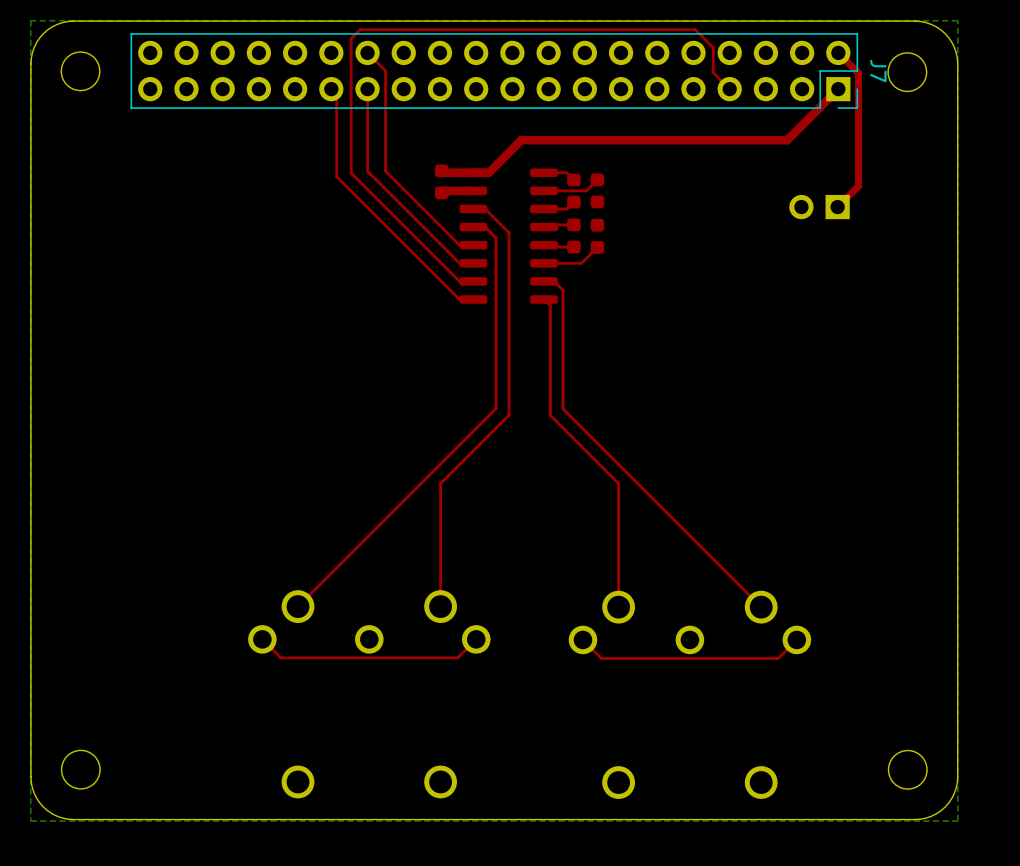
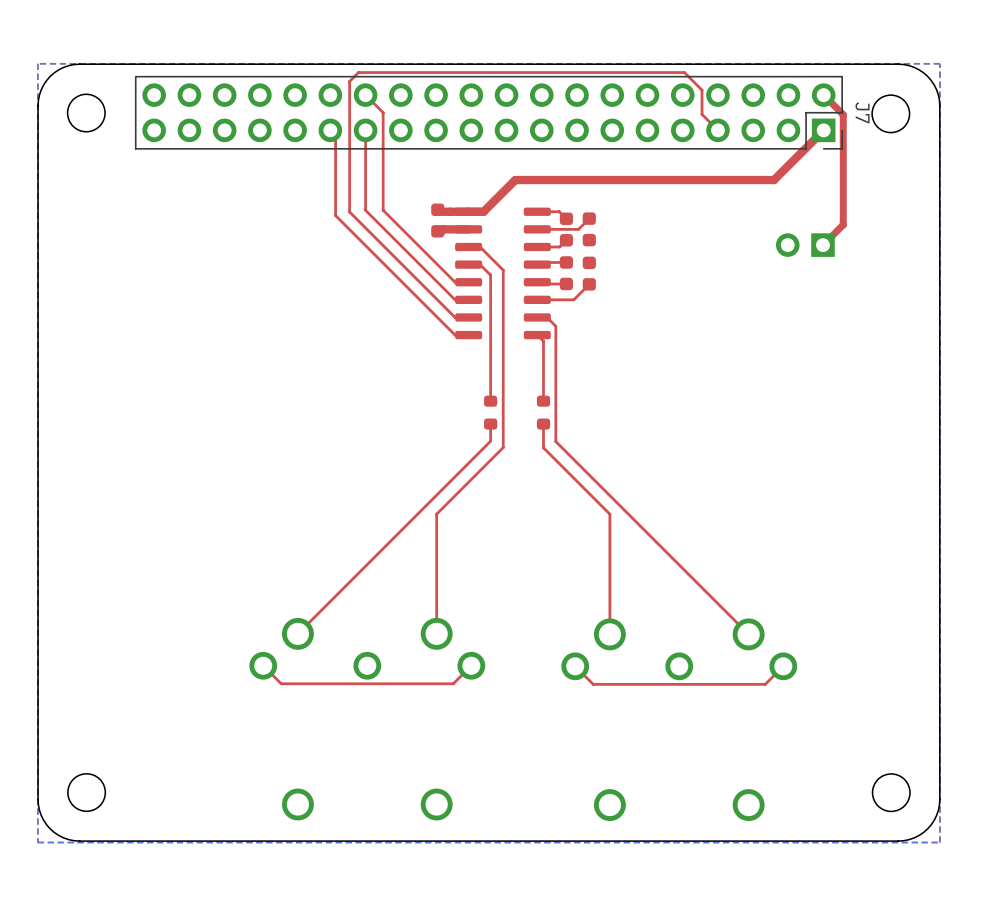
top track: (496, 367) (496, 390) -> none
top track: (550, 367) (550, 390) -> none
part: none -> (490, 412)
part: none -> (543, 412)

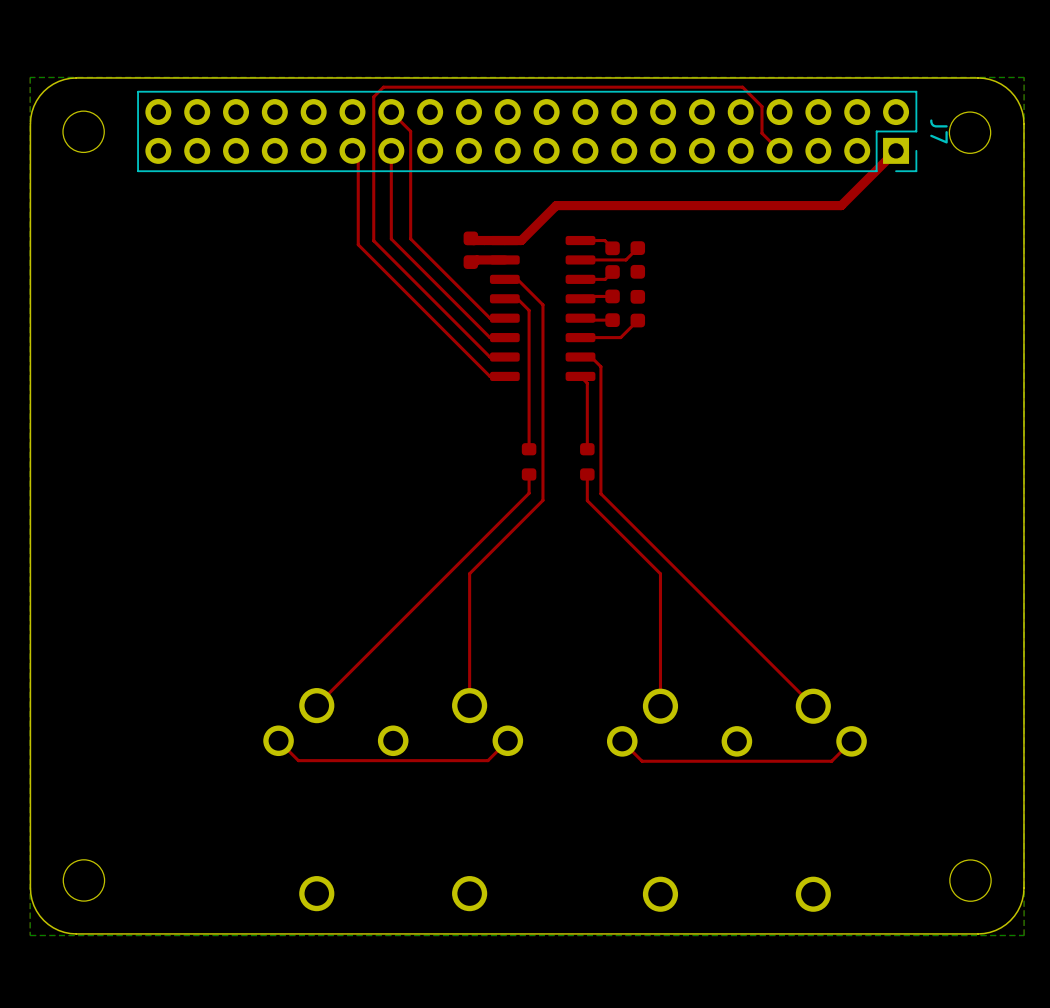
top track: (823, 95) (843, 114) (843, 224) (823, 245) -> none
part: (805, 245) -> none

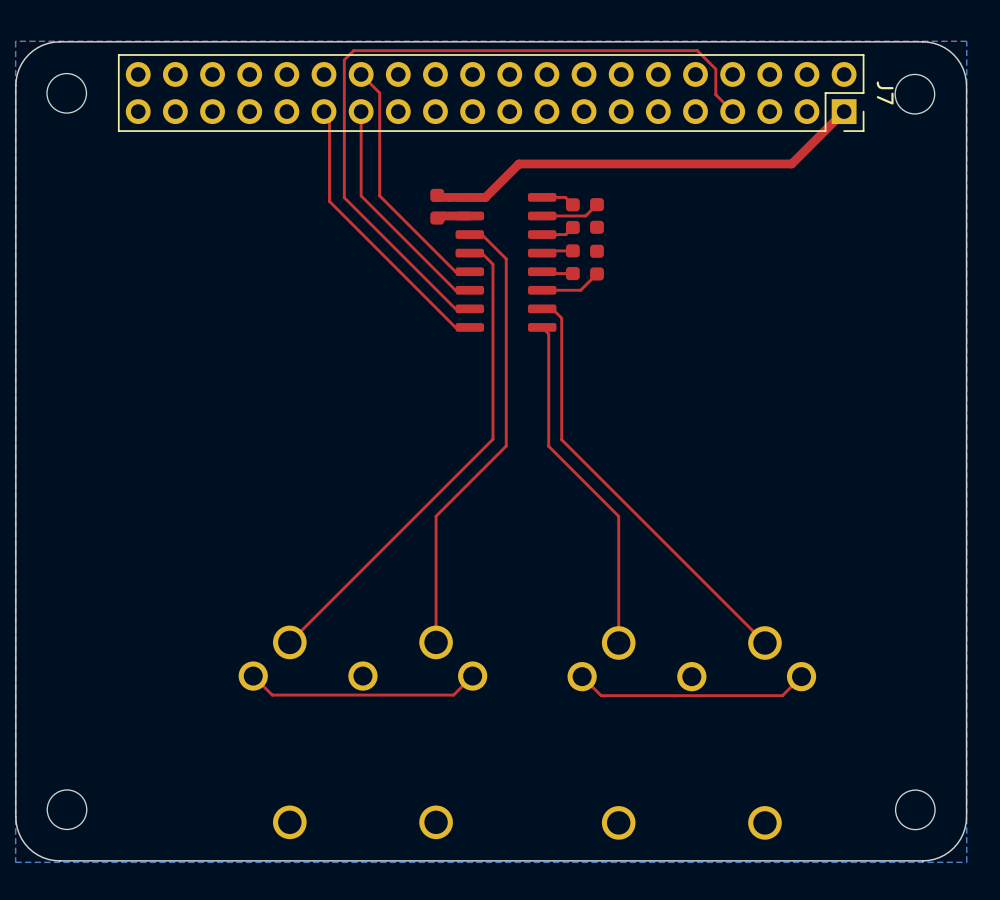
top track: none -> (492, 397) (492, 421)
top track: none -> (548, 397) (548, 421)
part: (529, 461) -> none
part: (587, 461) -> none

